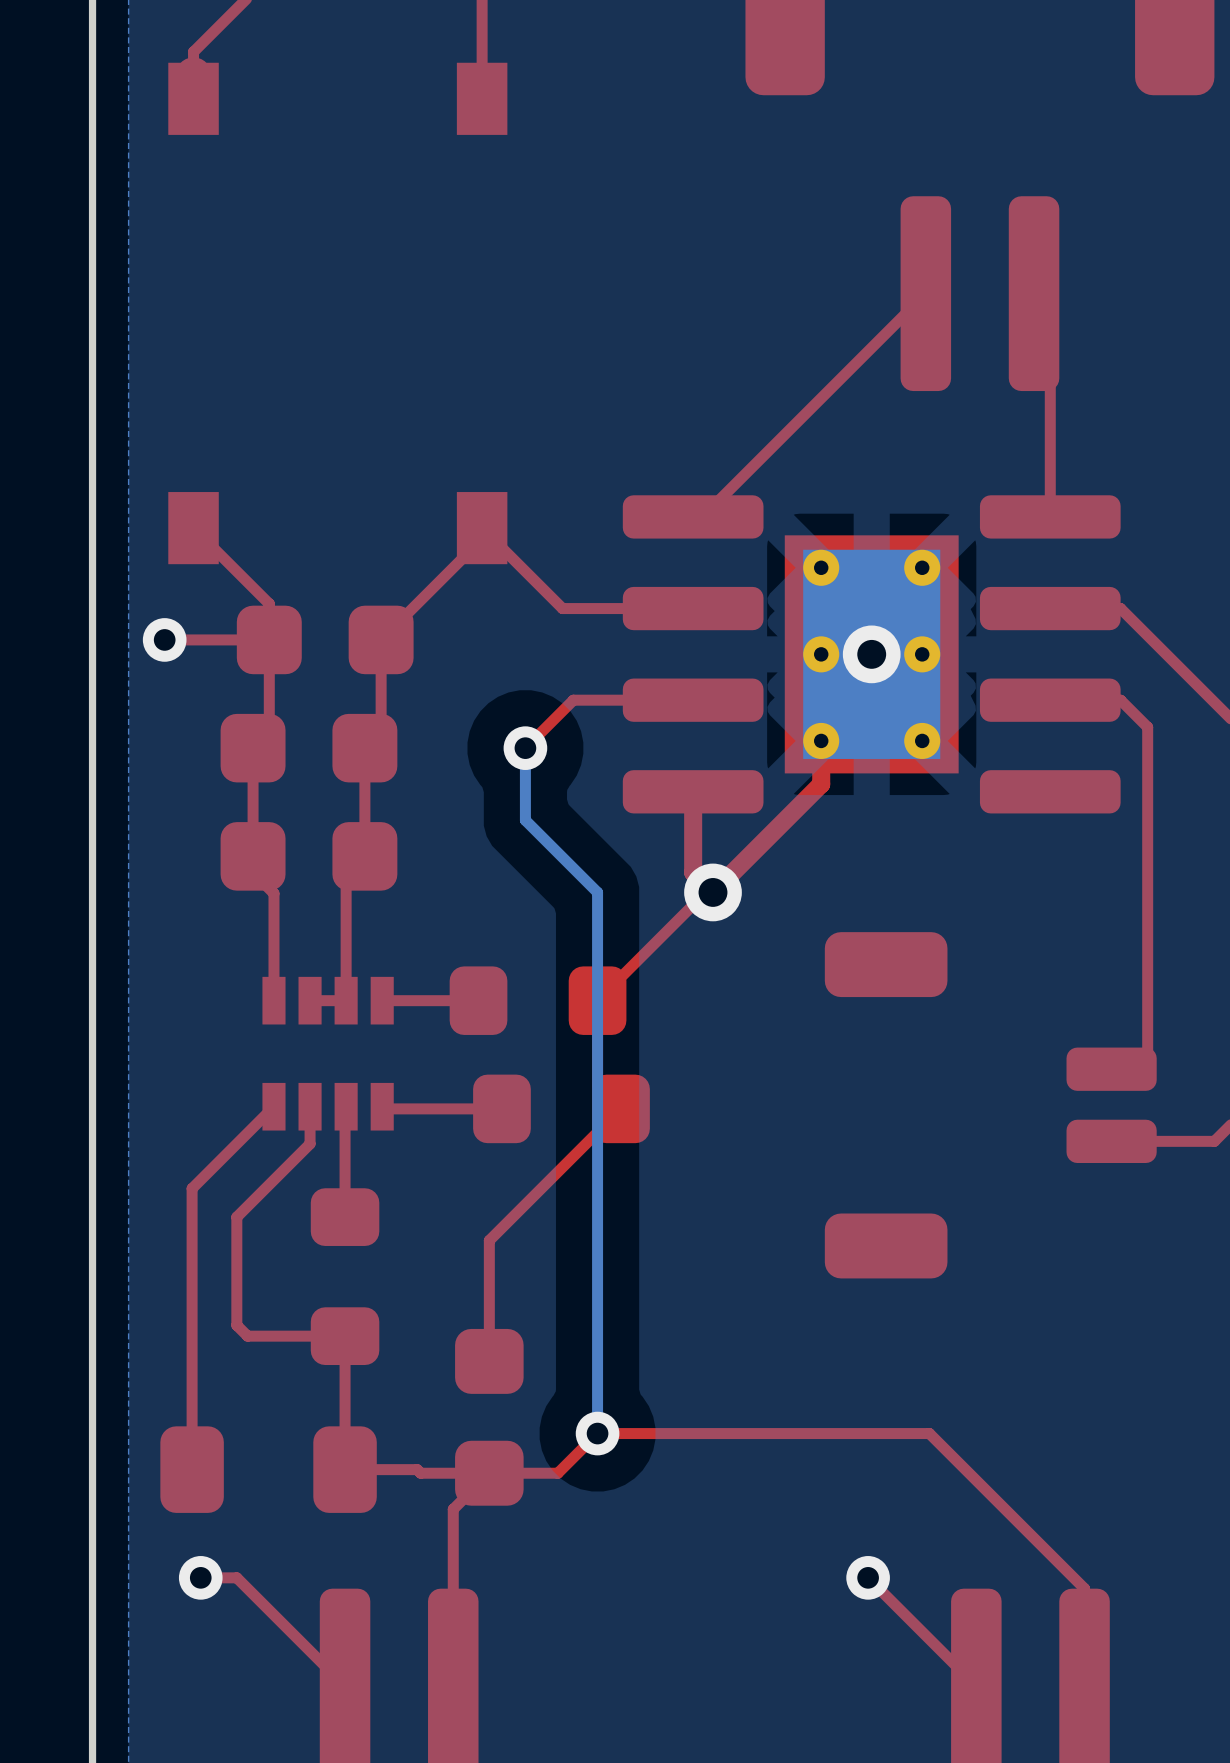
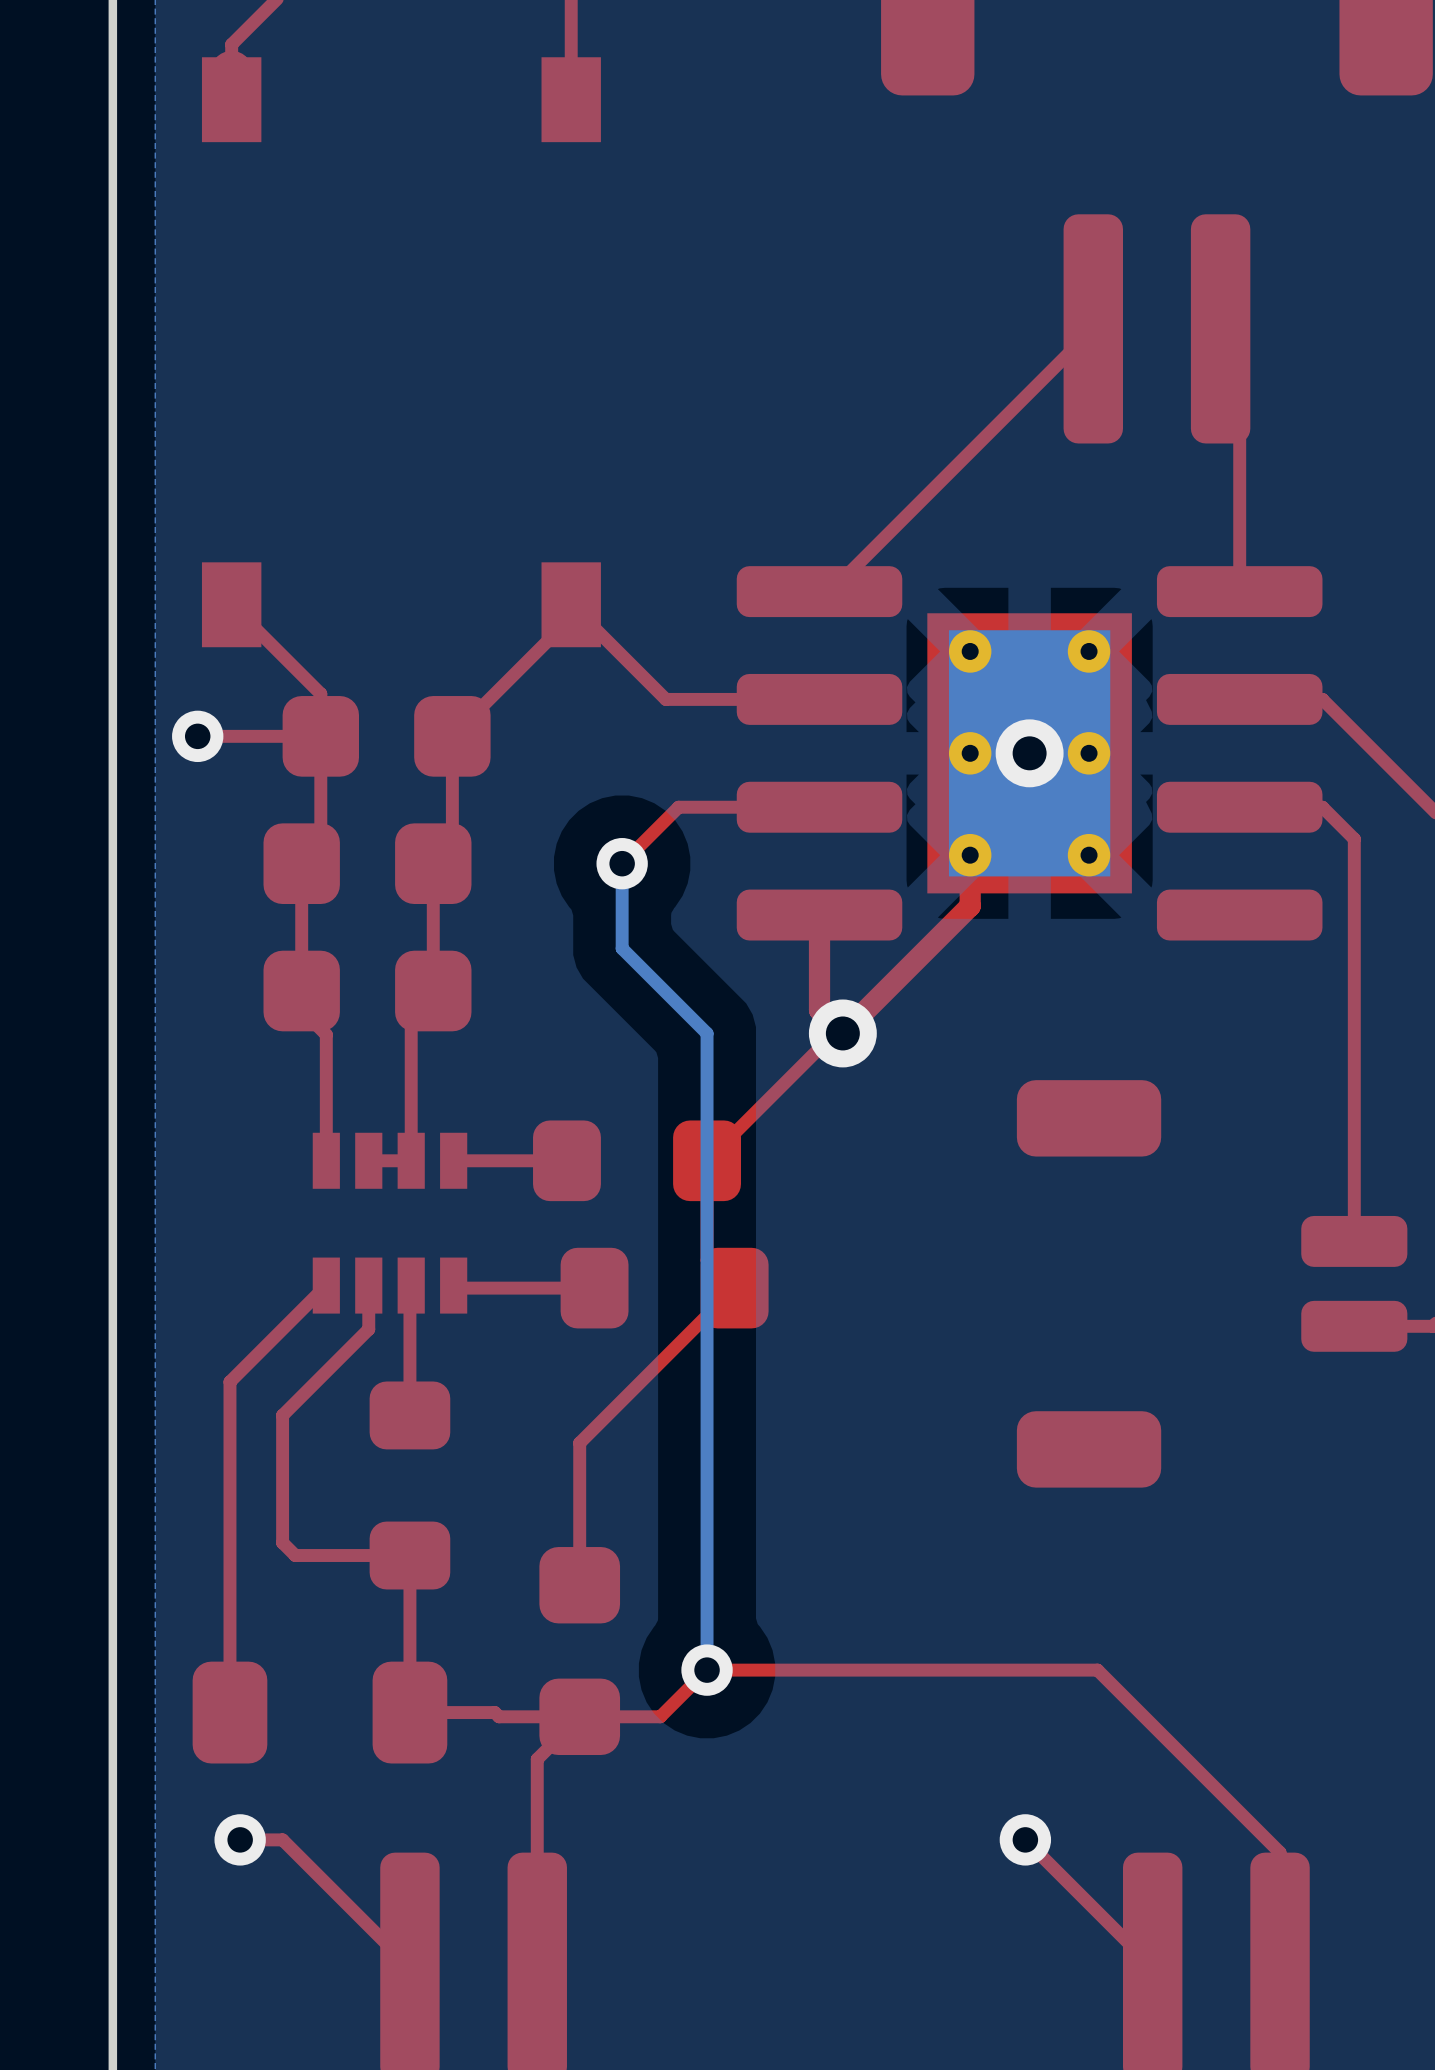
part position: (990, 1105) -> (1212, 1283)

